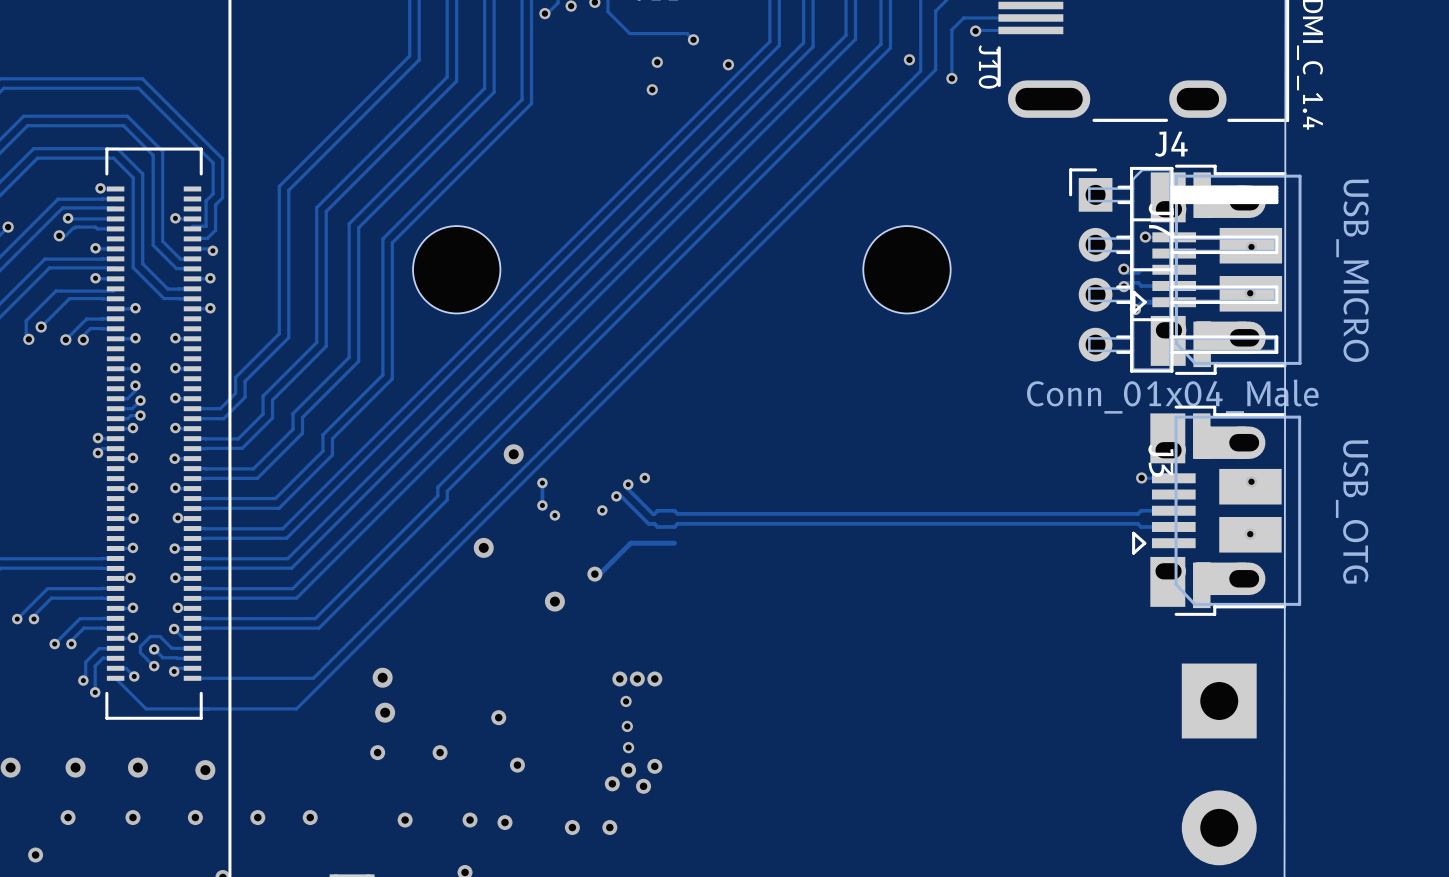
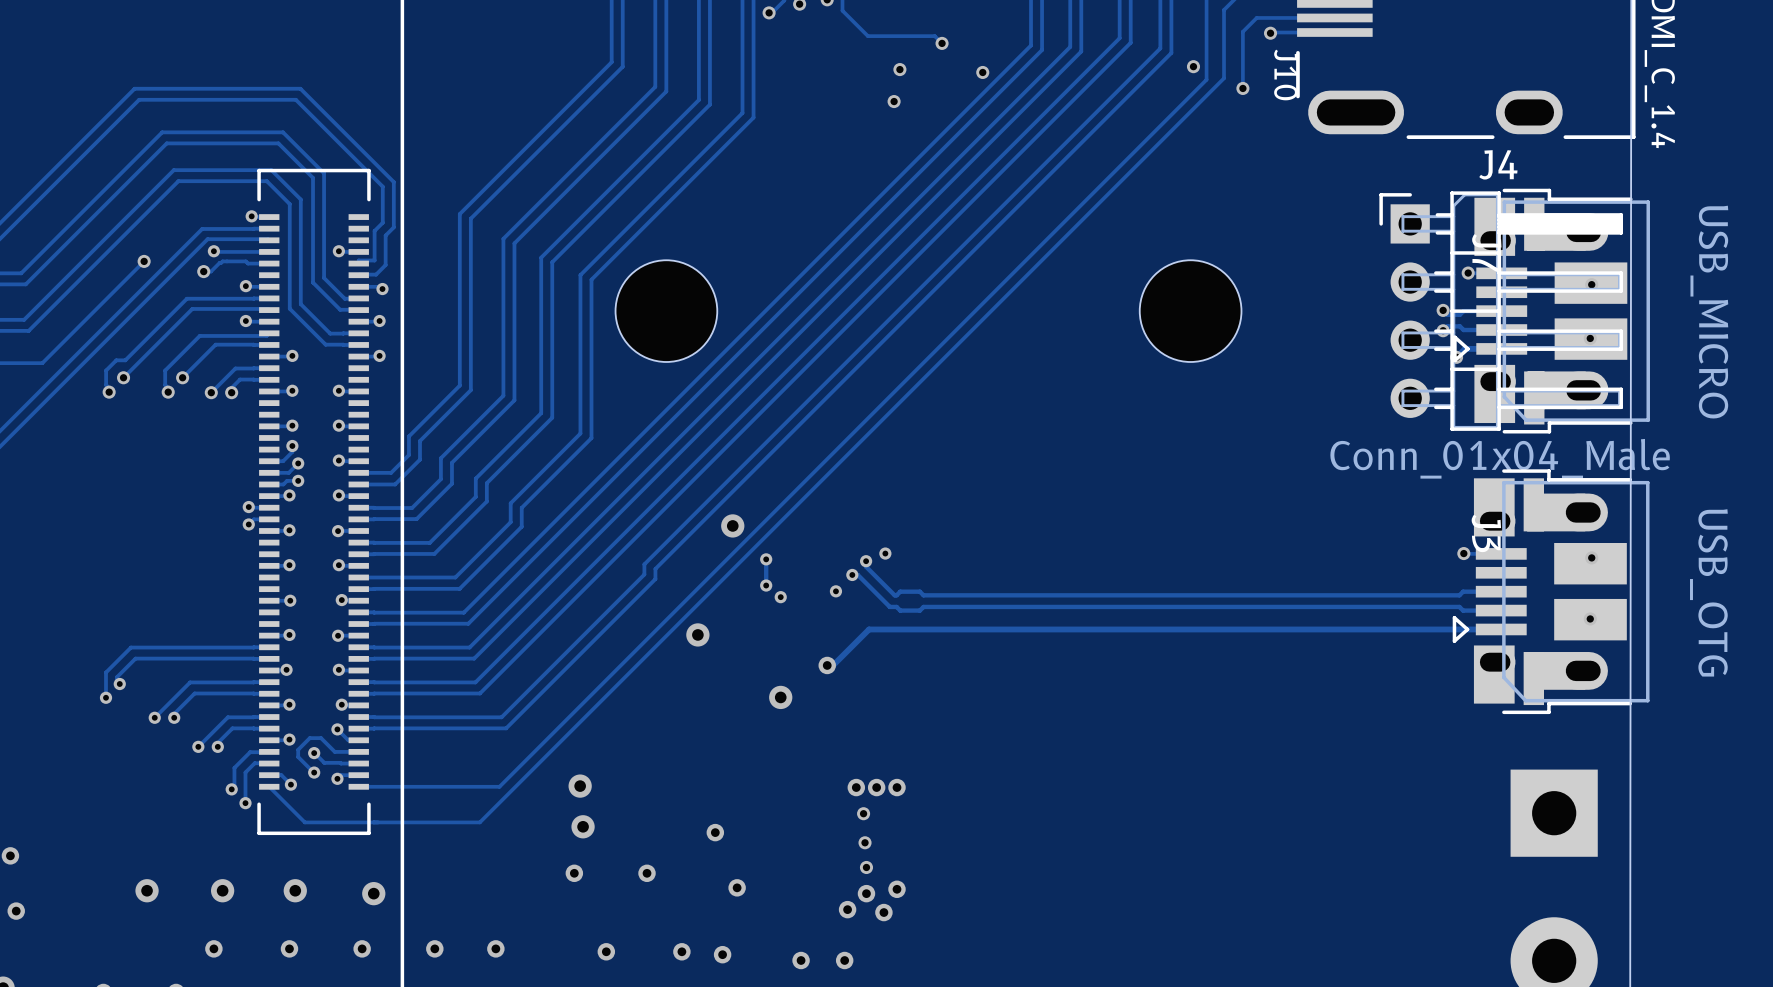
track: none -> (1501, 629) (919, 629)

